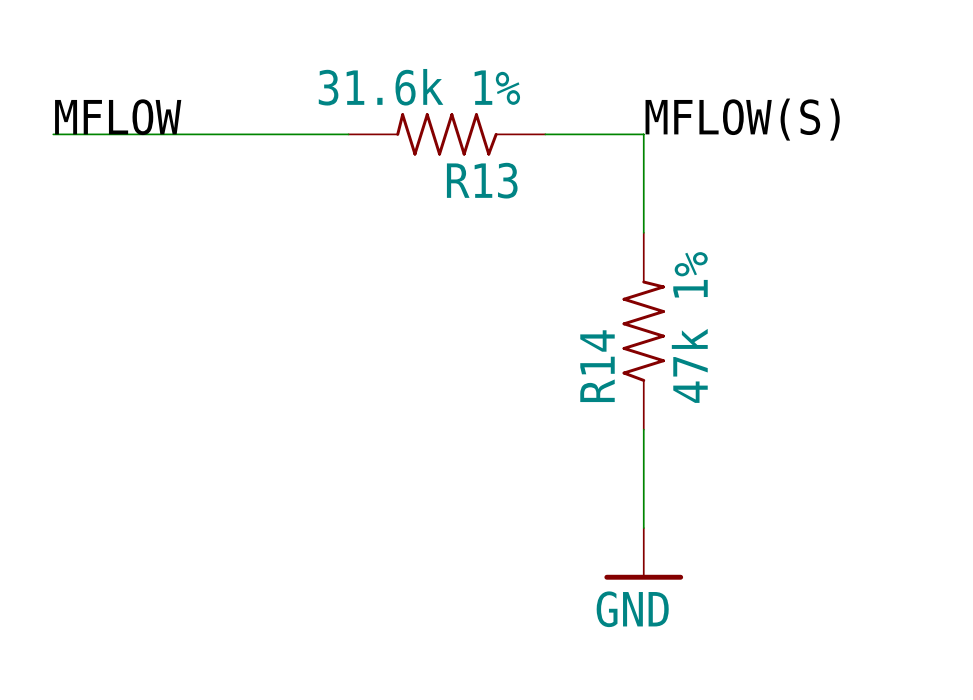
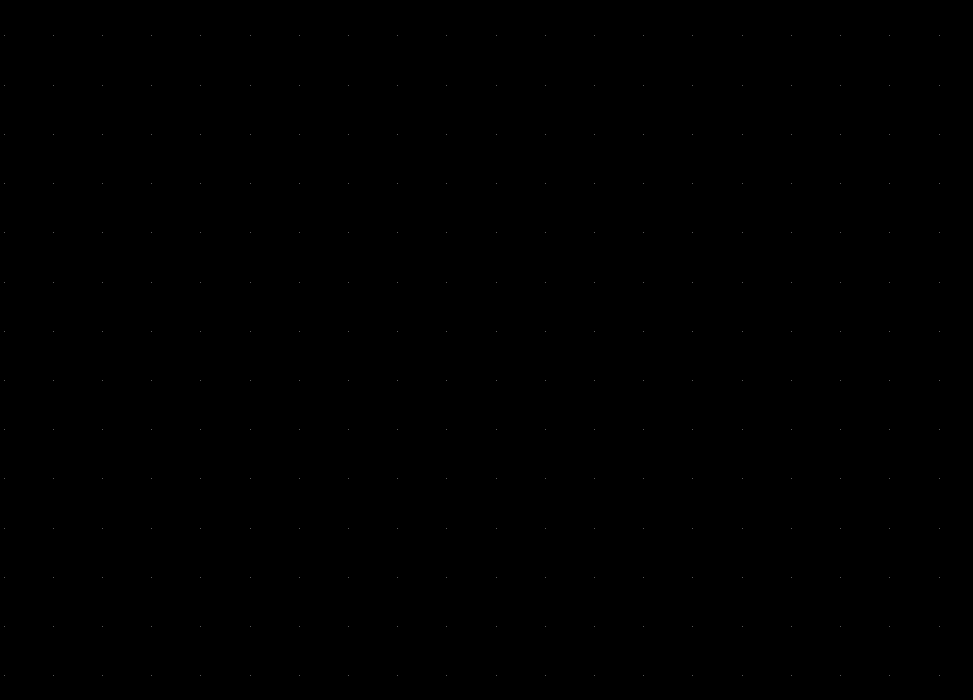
label: MFLOW (118, 117) -> none
label: MFLOW(S) (742, 119) -> none
wire: (53, 134) (348, 134) -> none
R13: 31.6k 1% (446, 134) -> none
wire: (545, 134) (643, 134) (643, 232) -> none
R14: 47k 1% (643, 331) -> none
wire: (643, 429) (643, 528) -> none
power symbol: GND (643, 553) -> none

